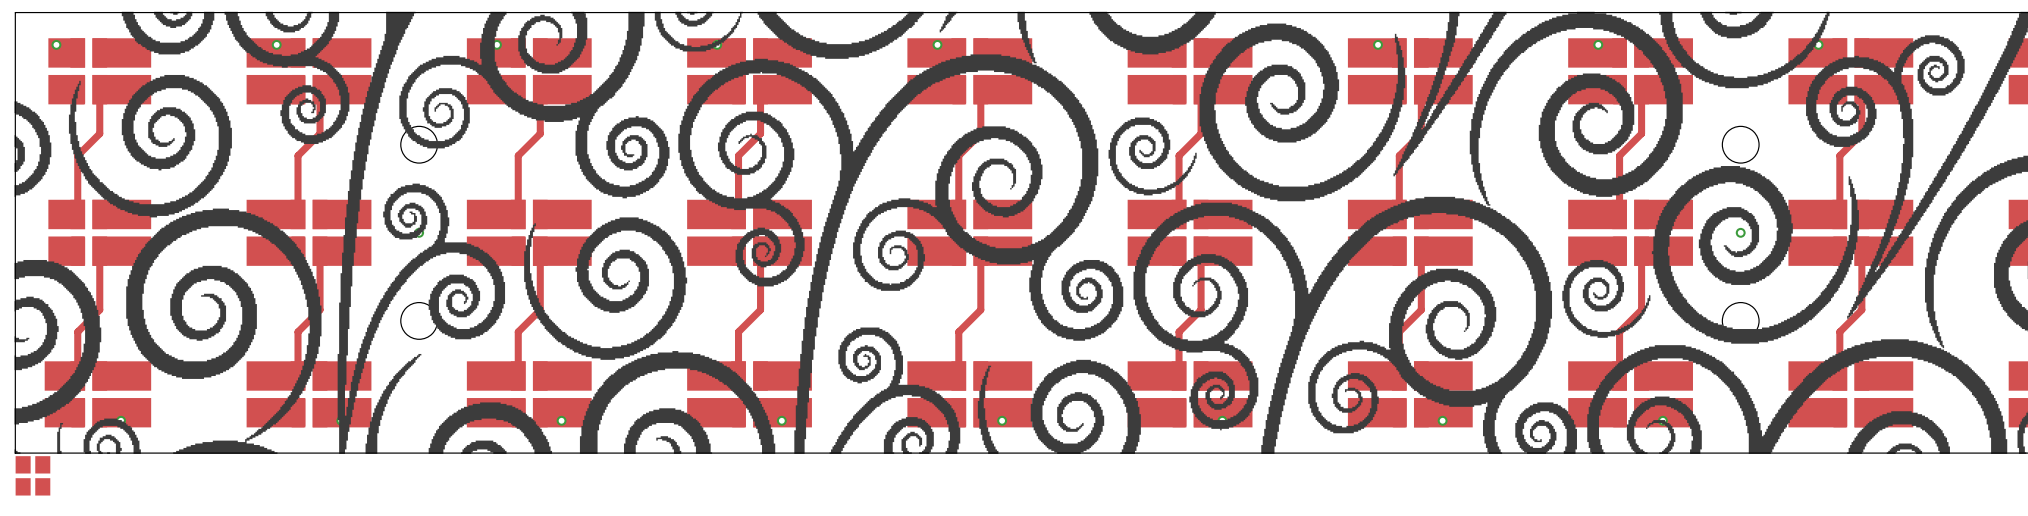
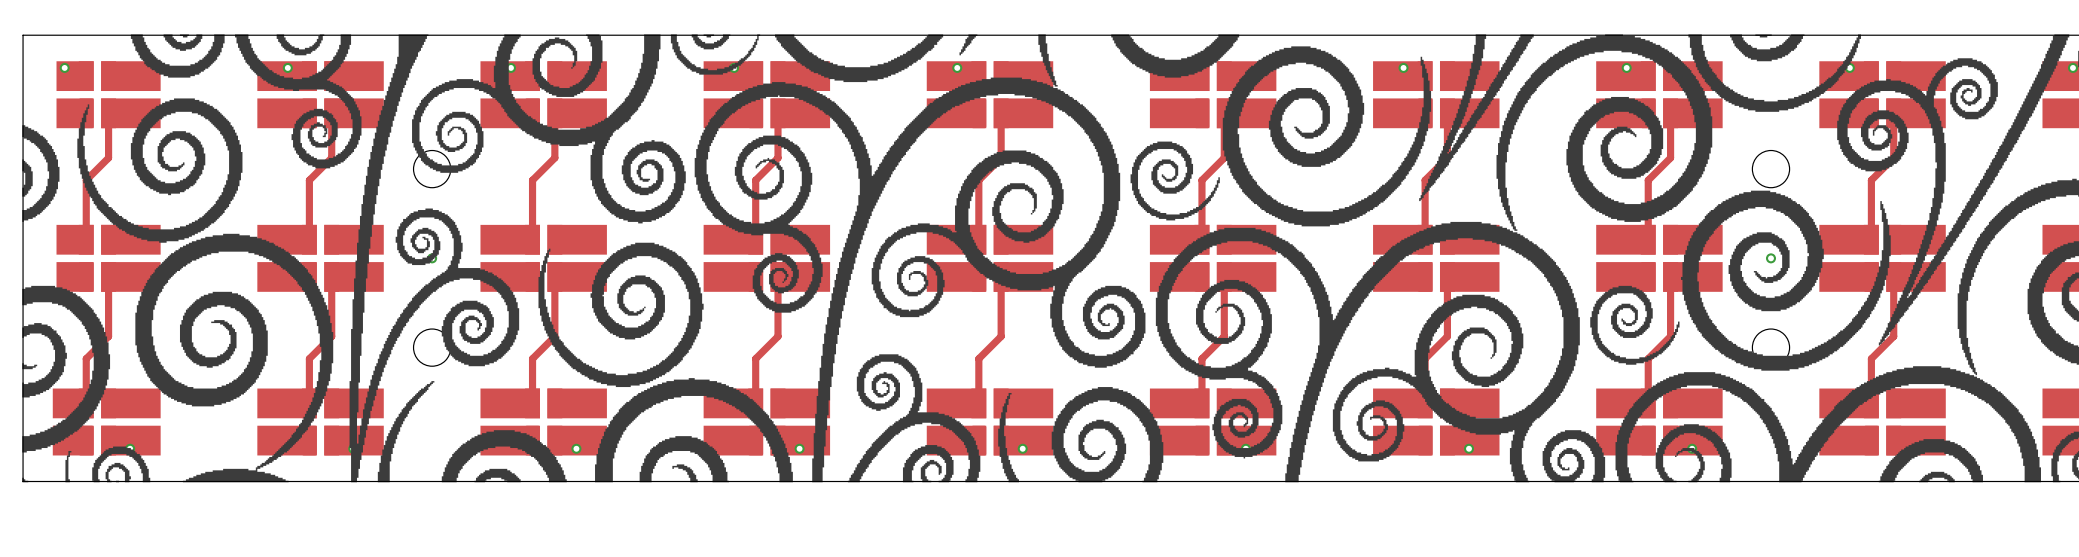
part: (32, 464) -> none
part: (32, 486) -> none

